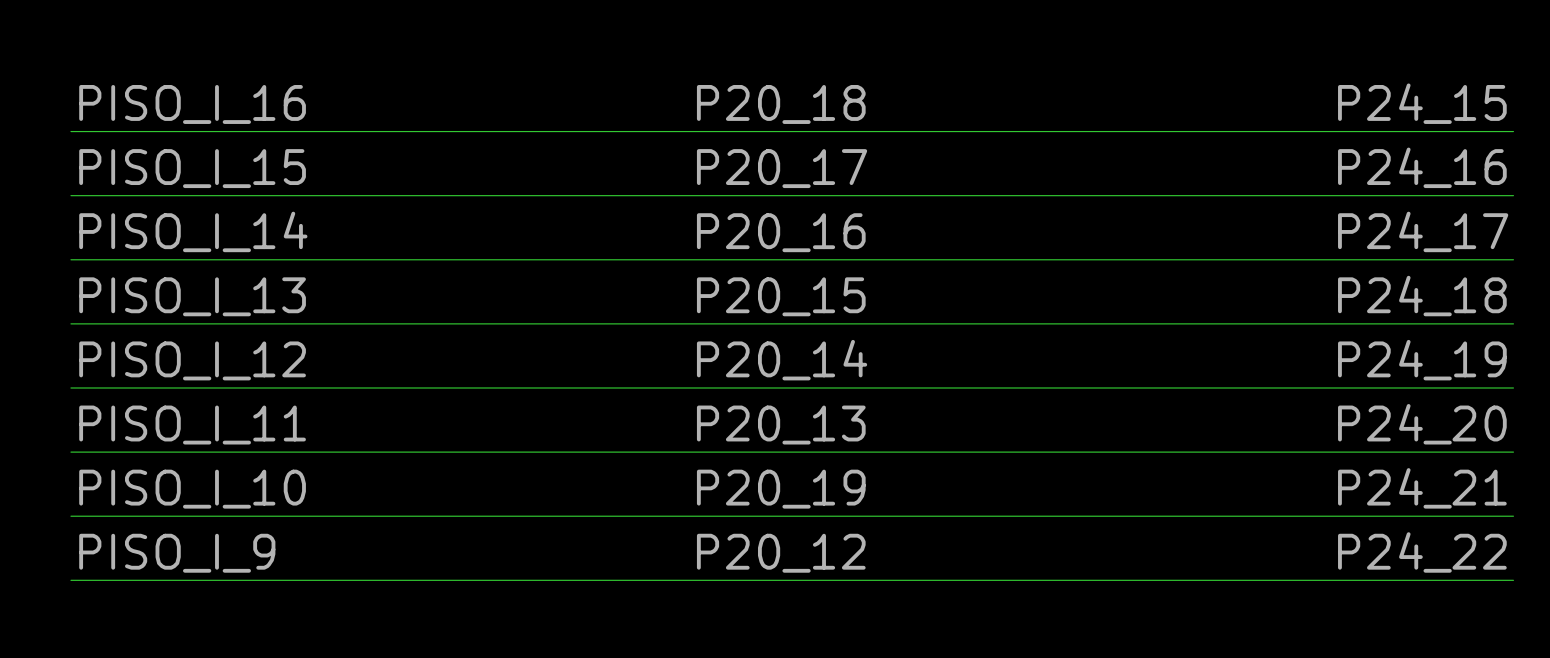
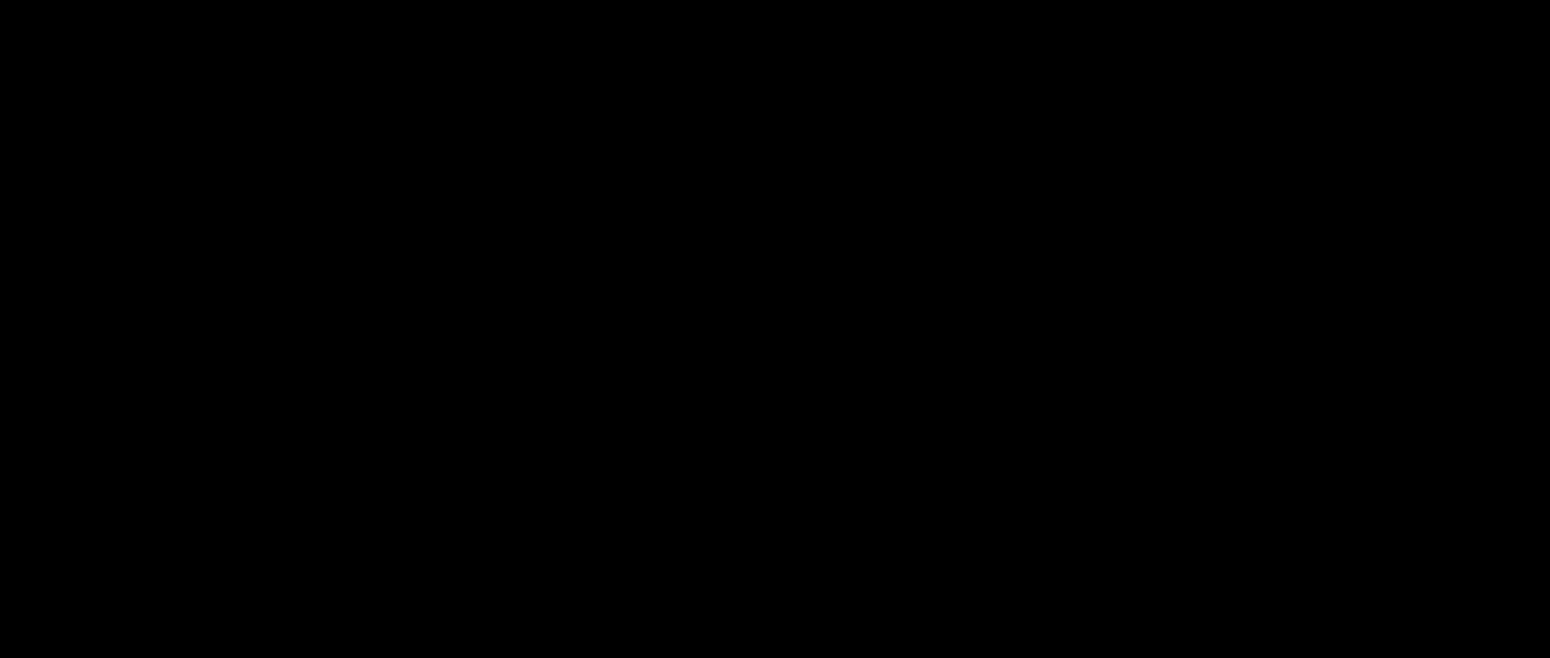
label: P24_15 (1422, 103) -> none
label: PISO_I_16 (192, 104) -> none
label: P20_18 (781, 104) -> none
wire: (70, 131) (1513, 131) -> none
label: P24_16 (1422, 167) -> none
label: PISO_I_15 (192, 168) -> none
label: P20_17 (782, 168) -> none
wire: (70, 195) (1513, 195) -> none
label: PISO_I_14 (193, 231) -> none
label: P24_17 (1423, 231) -> none
label: P20_16 (781, 232) -> none
wire: (70, 259) (1513, 259) -> none
label: PISO_I_13 (192, 296) -> none
label: P20_15 (781, 296) -> none
label: P24_18 (1422, 296) -> none
wire: (70, 323) (1513, 323) -> none
label: PISO_I_12 (192, 360) -> none
label: P20_14 (782, 360) -> none
label: P24_19 (1422, 360) -> none
wire: (70, 387) (1513, 387) -> none
label: P24_20 (1422, 424) -> none
label: PISO_I_11 (192, 425) -> none
label: P20_13 (781, 425) -> none
wire: (70, 452) (1513, 452) -> none
label: P24_21 (1422, 488) -> none
label: PISO_I_10 (192, 489) -> none
label: P20_19 (781, 489) -> none
wire: (70, 516) (1513, 516) -> none
label: P24_22 (1422, 552) -> none
label: PISO_I_9 (177, 553) -> none
label: P20_12 (781, 553) -> none
wire: (70, 580) (1513, 580) -> none

